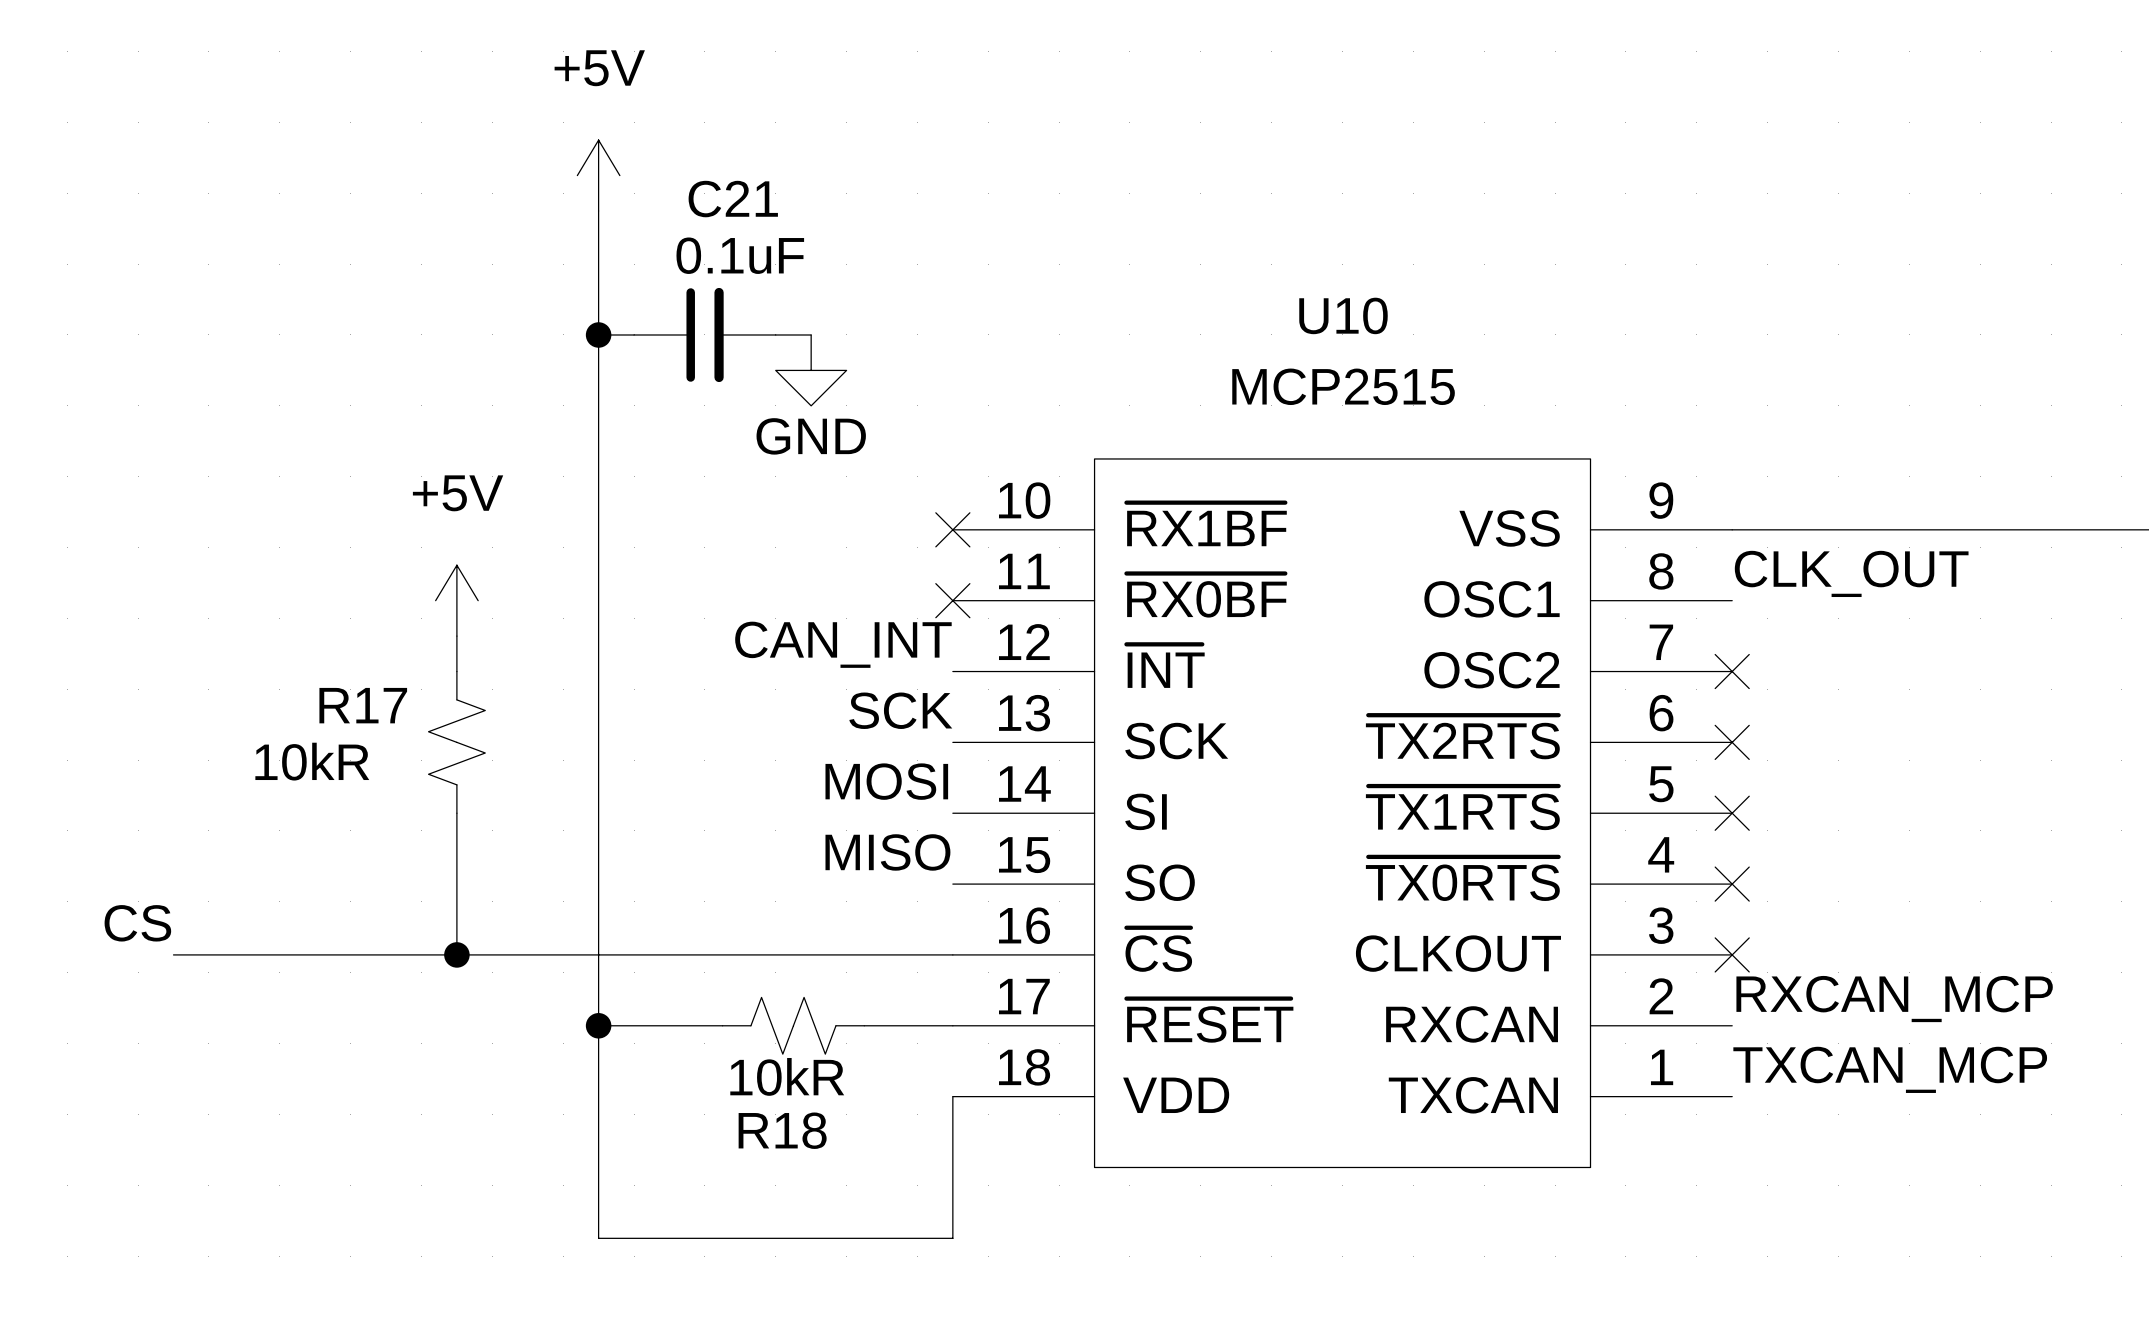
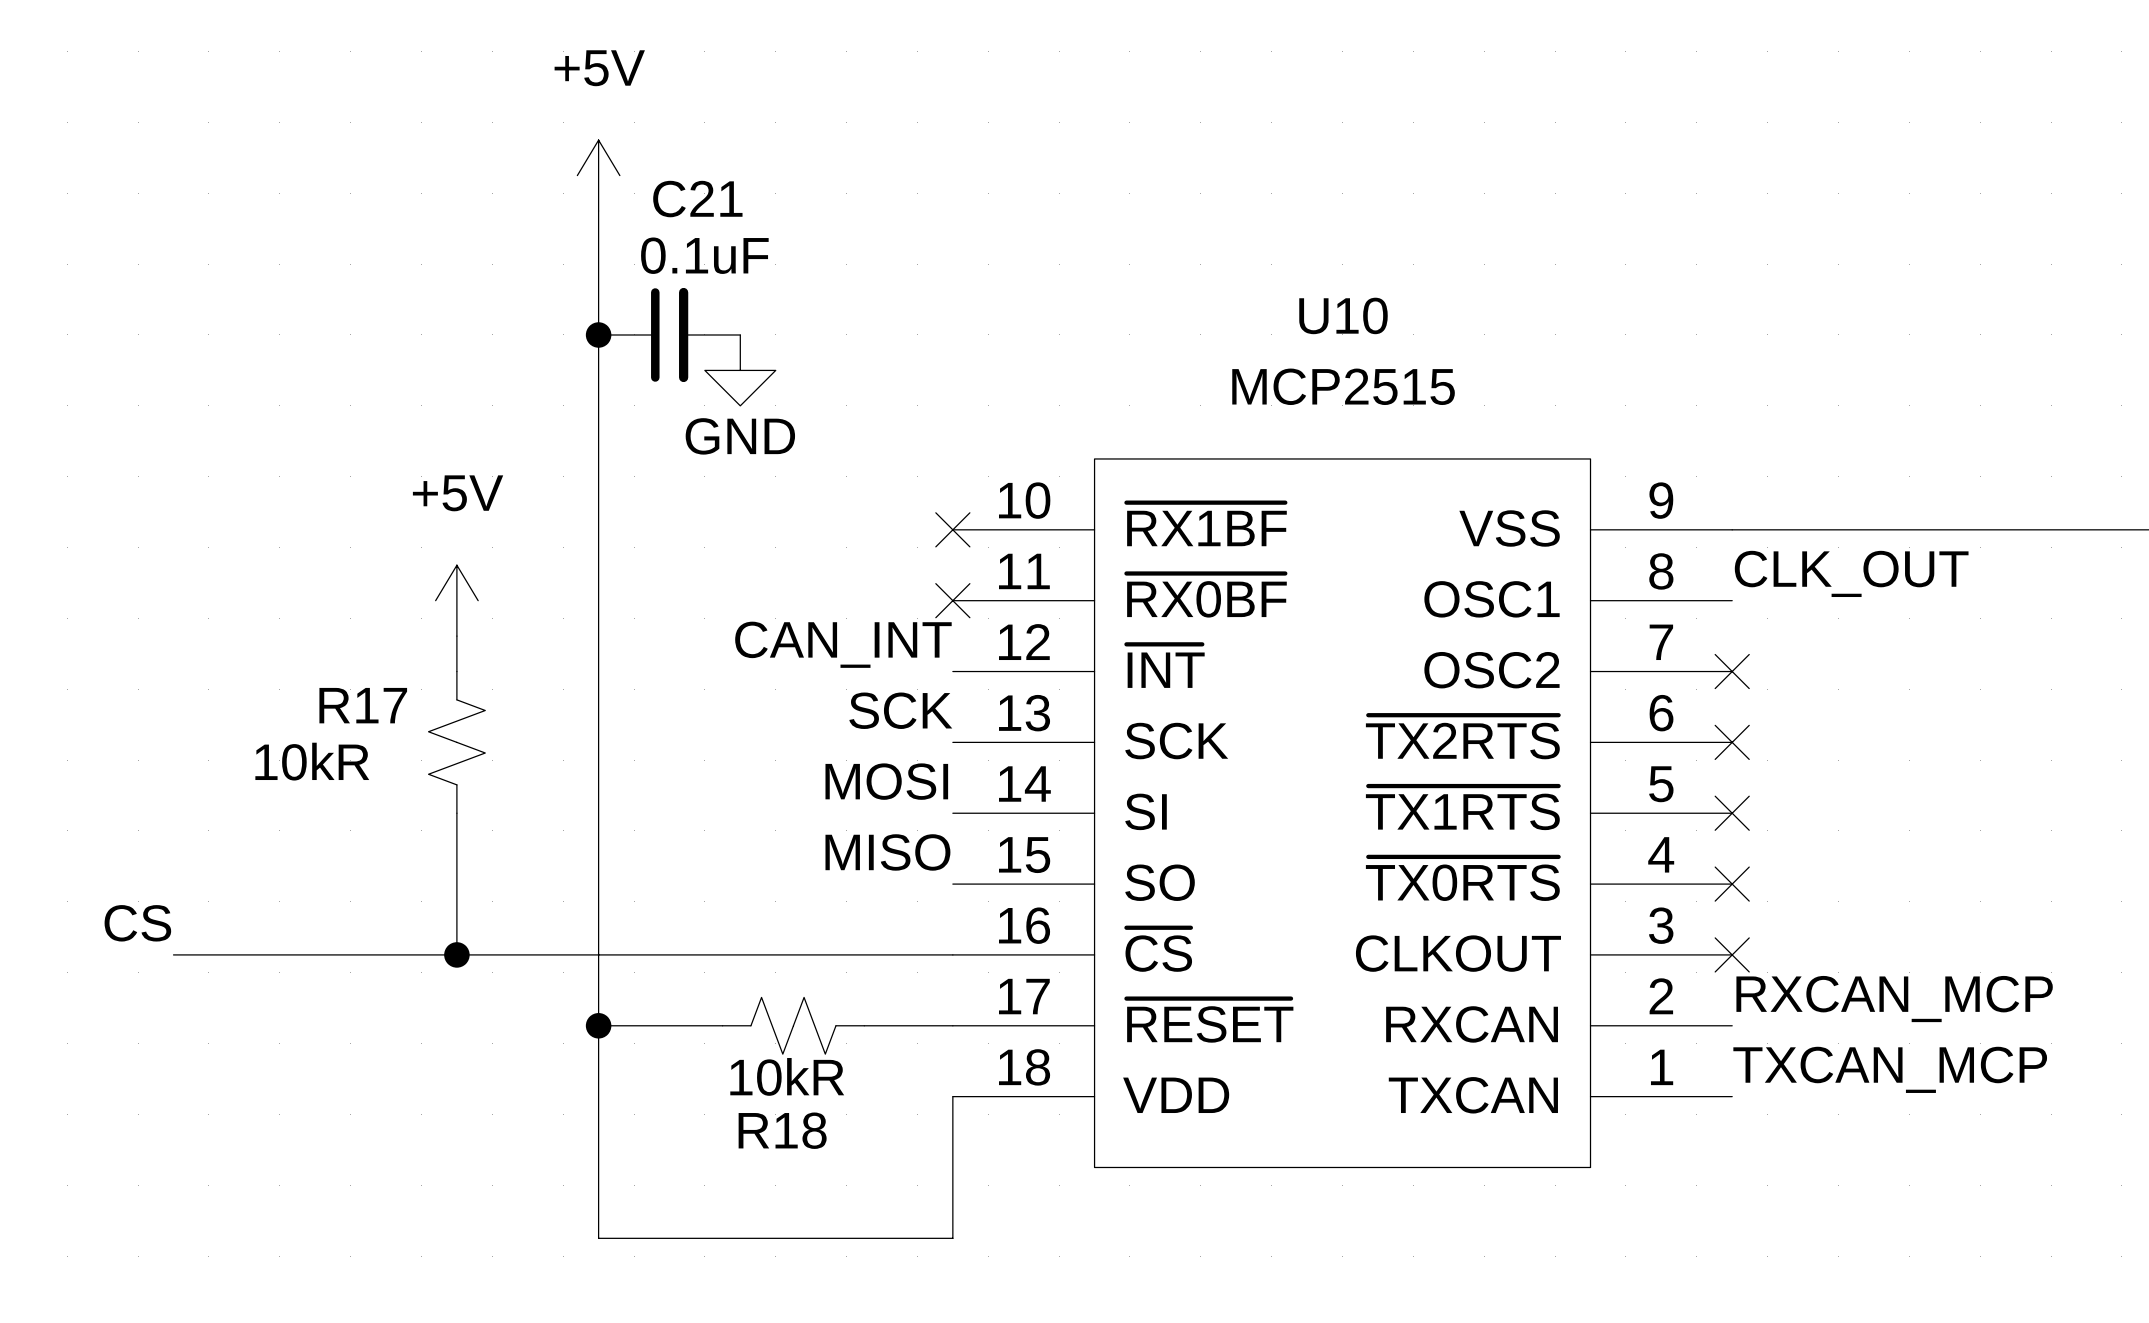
C21 position: (704, 334) -> (669, 334)
wire: (775, 334) (811, 334) -> none
power symbol position: GND (811, 370) -> GND (740, 370)

